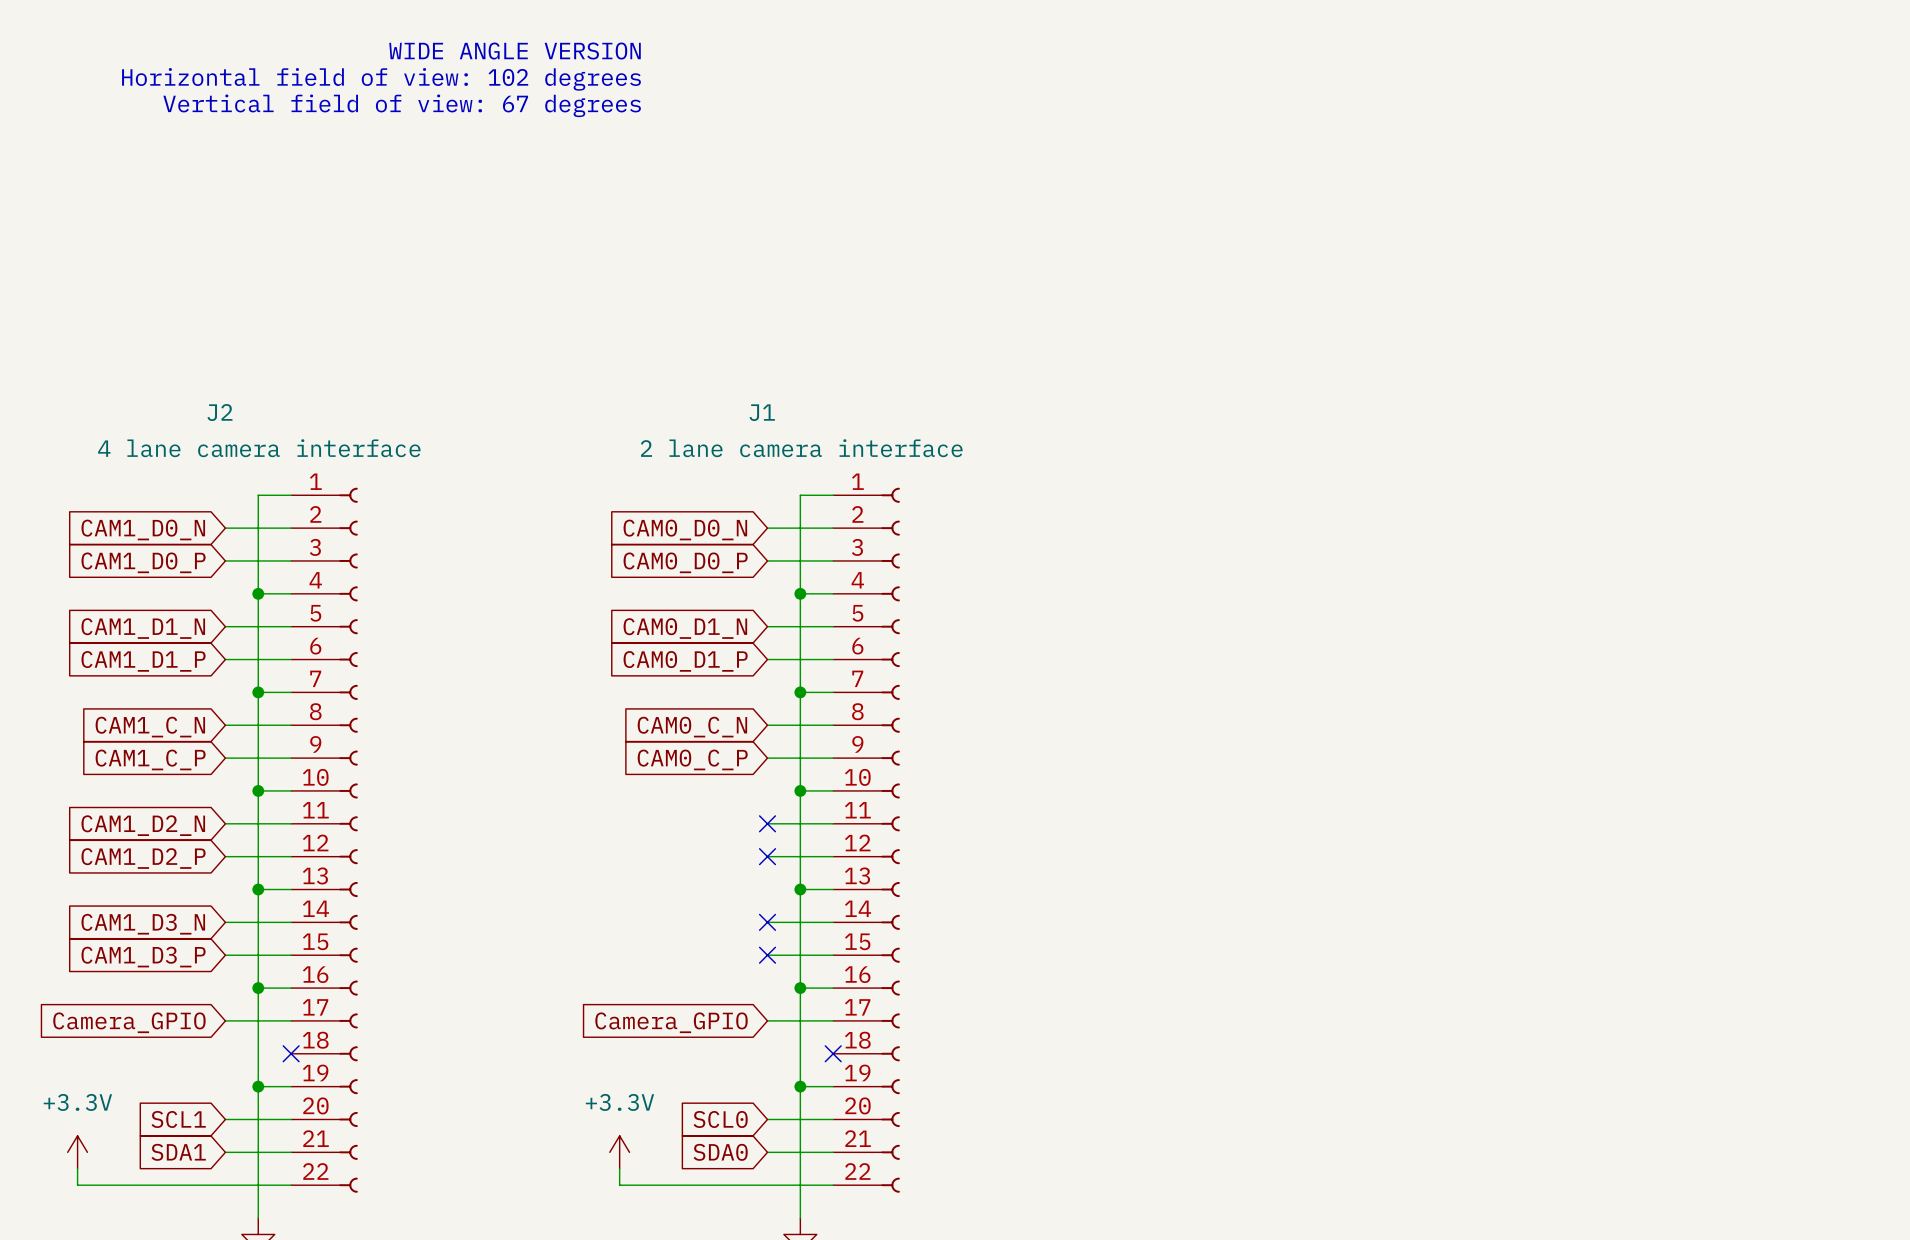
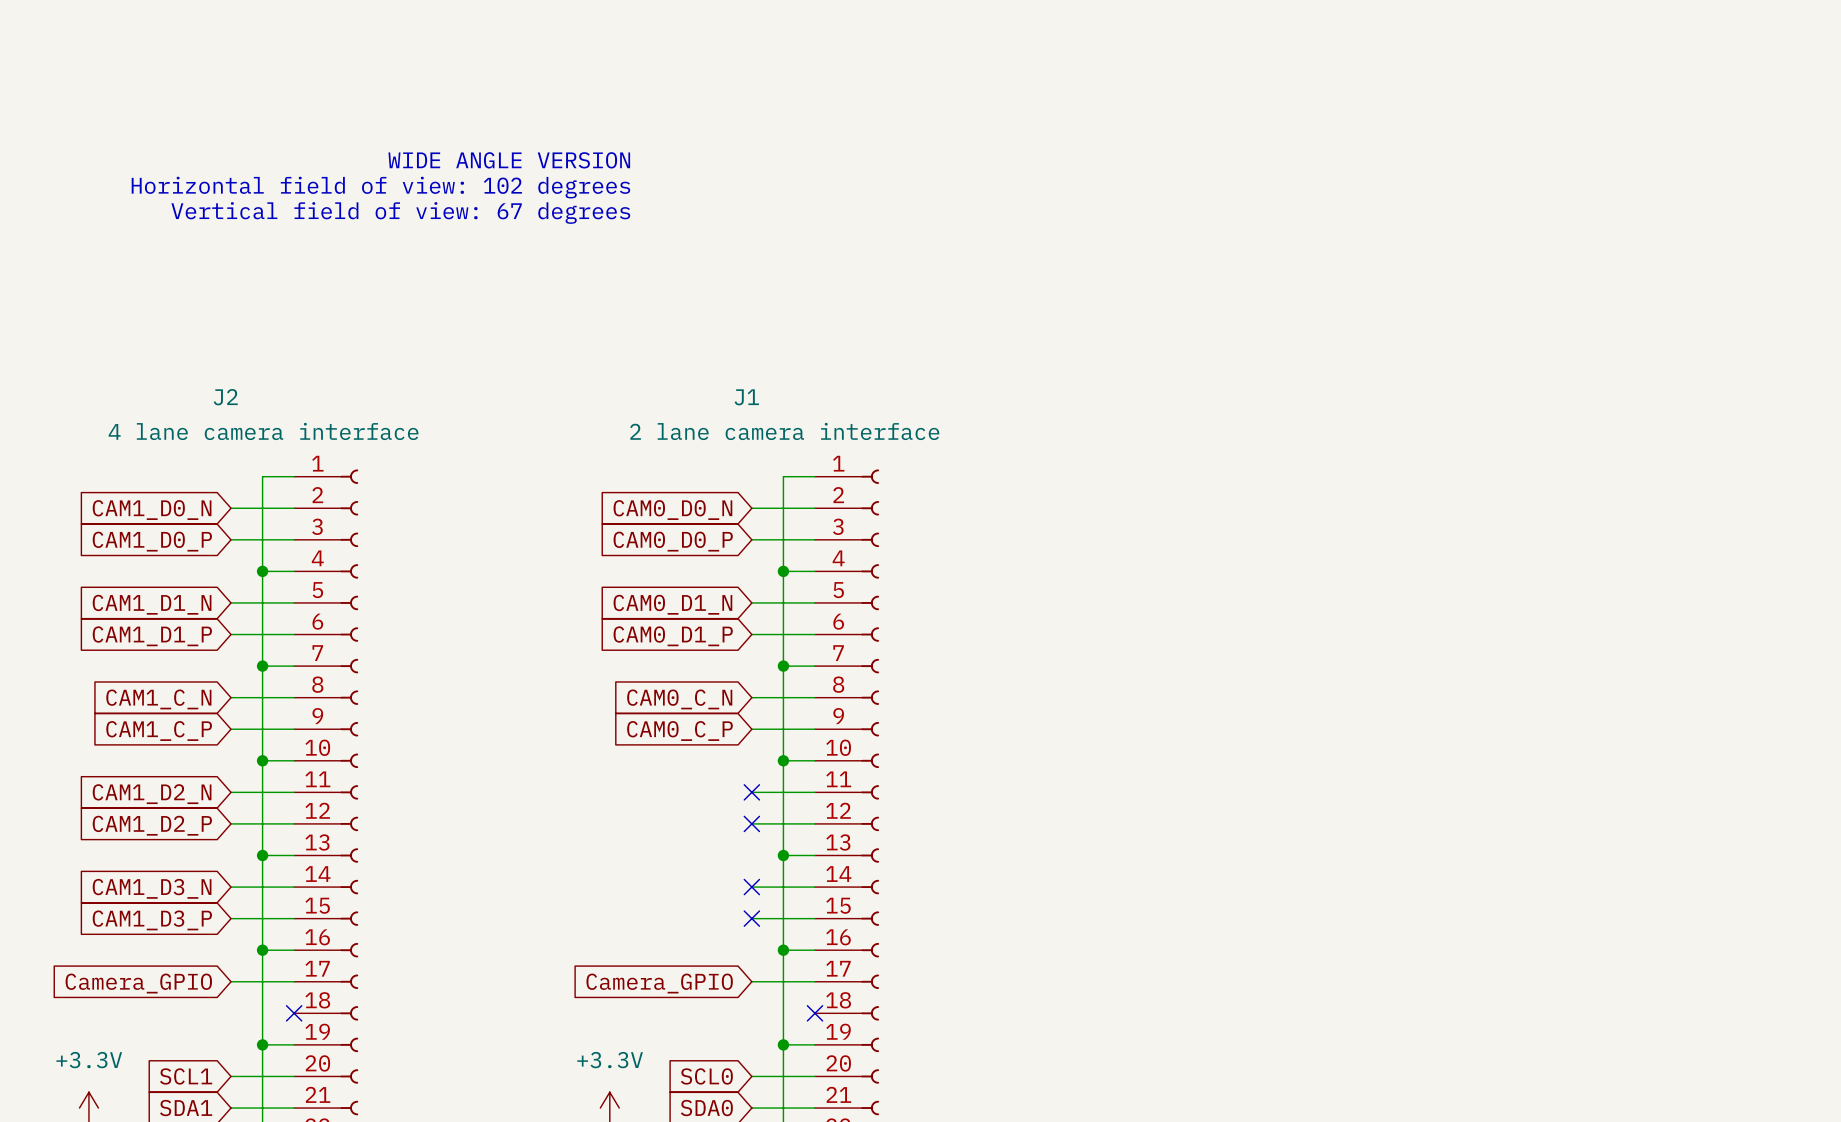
text position: WIDE ANGLE VERSION (515, 51) -> WIDE ANGLE VERSION (509, 160)
text position: Horizontal field of view: 102 degrees (381, 79) -> Horizontal field of view: 102 degrees (380, 187)
text position: Vertical field of view: 67 degrees (402, 105) -> Vertical field of view: 67 degrees (400, 212)

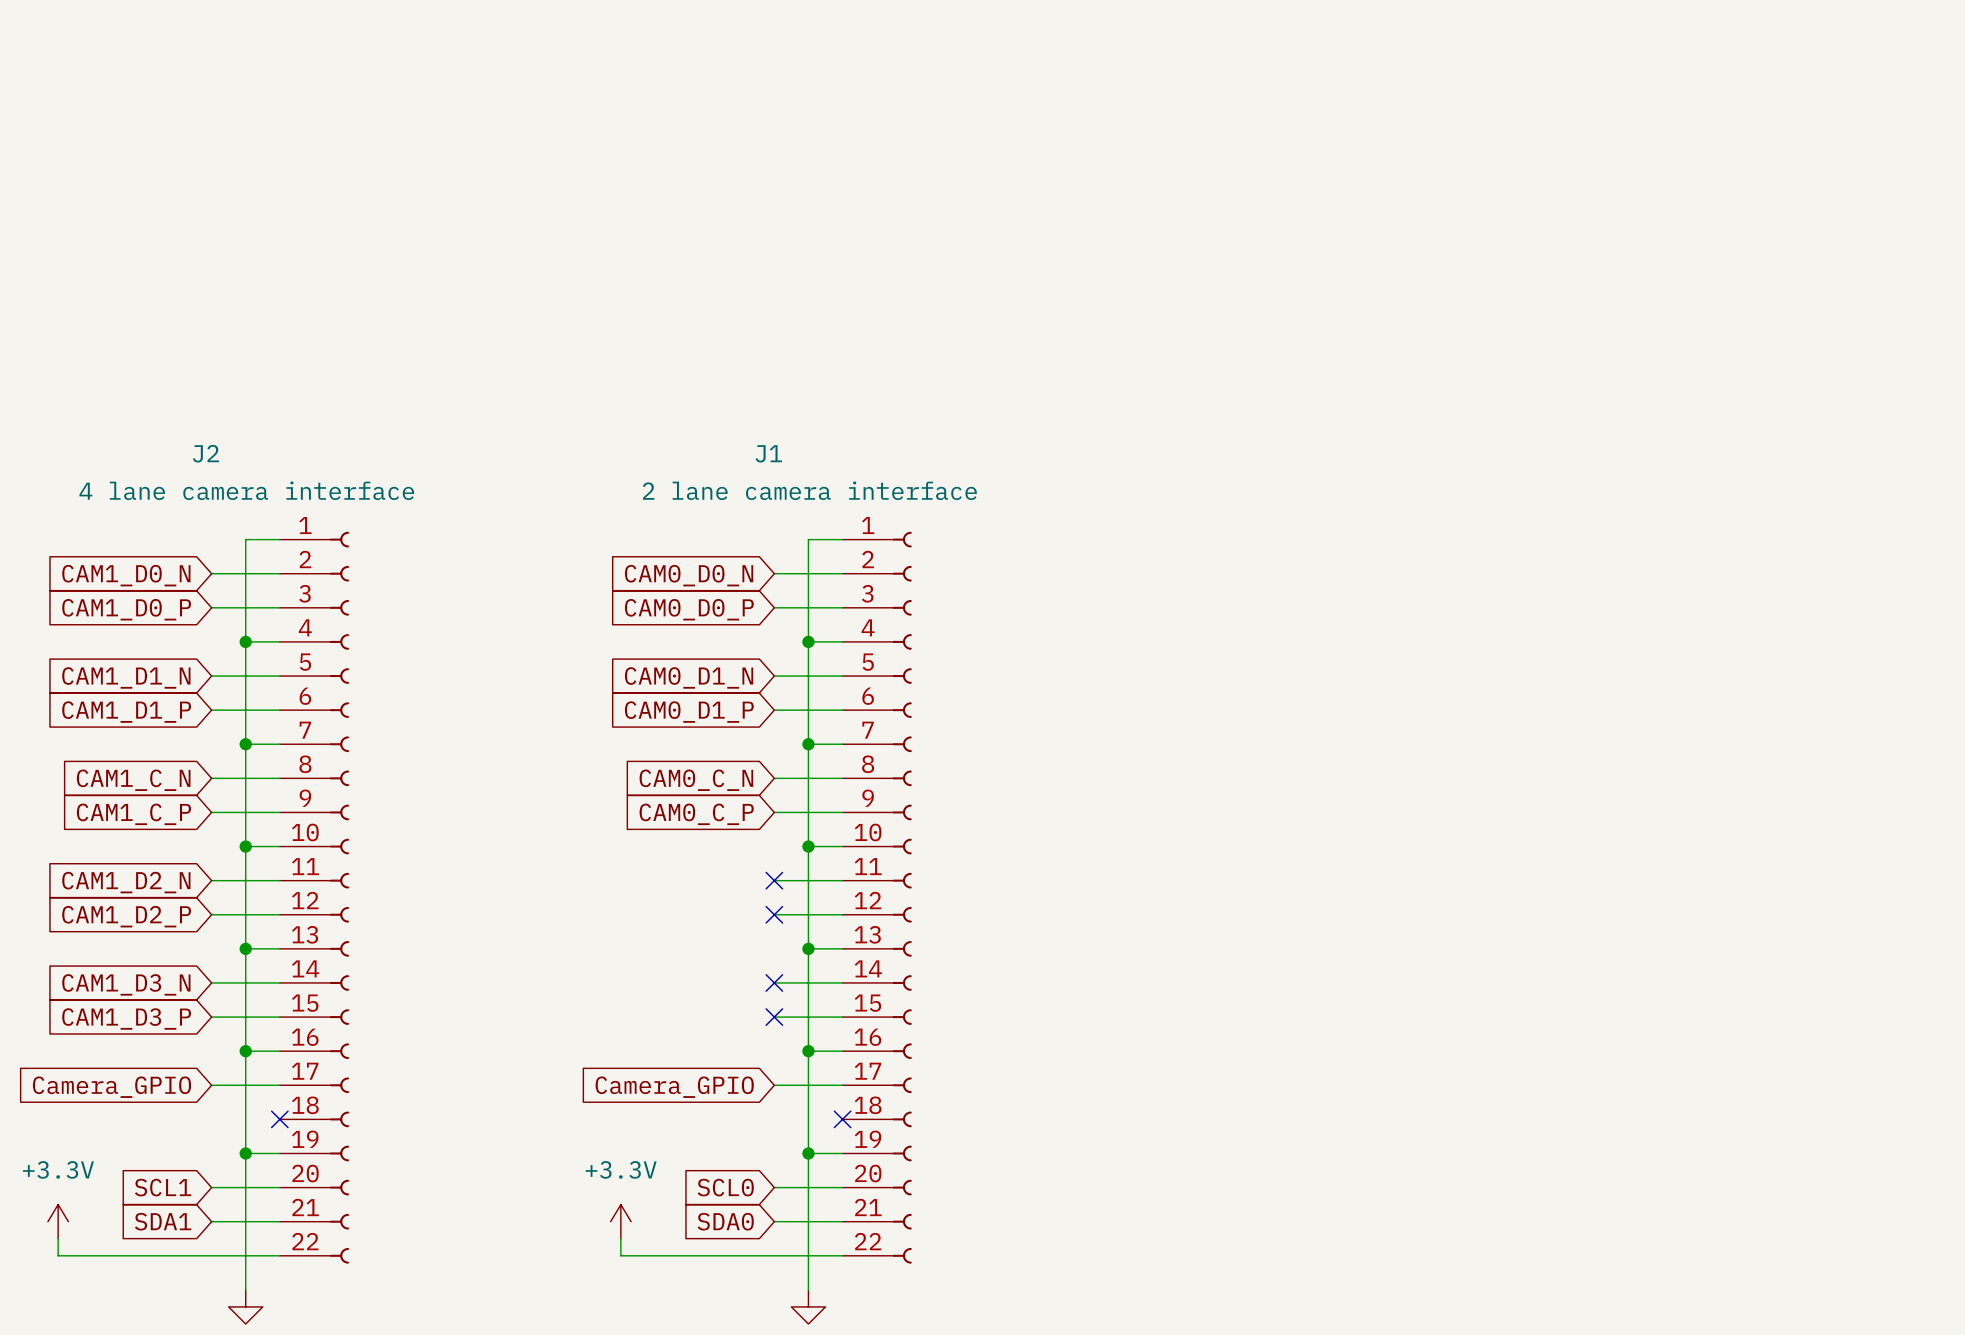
text: WIDE ANGLE VERSION (509, 160) -> none
text: Horizontal field of view: 102 degrees (380, 187) -> none
text: Vertical field of view: 67 degrees (400, 212) -> none

